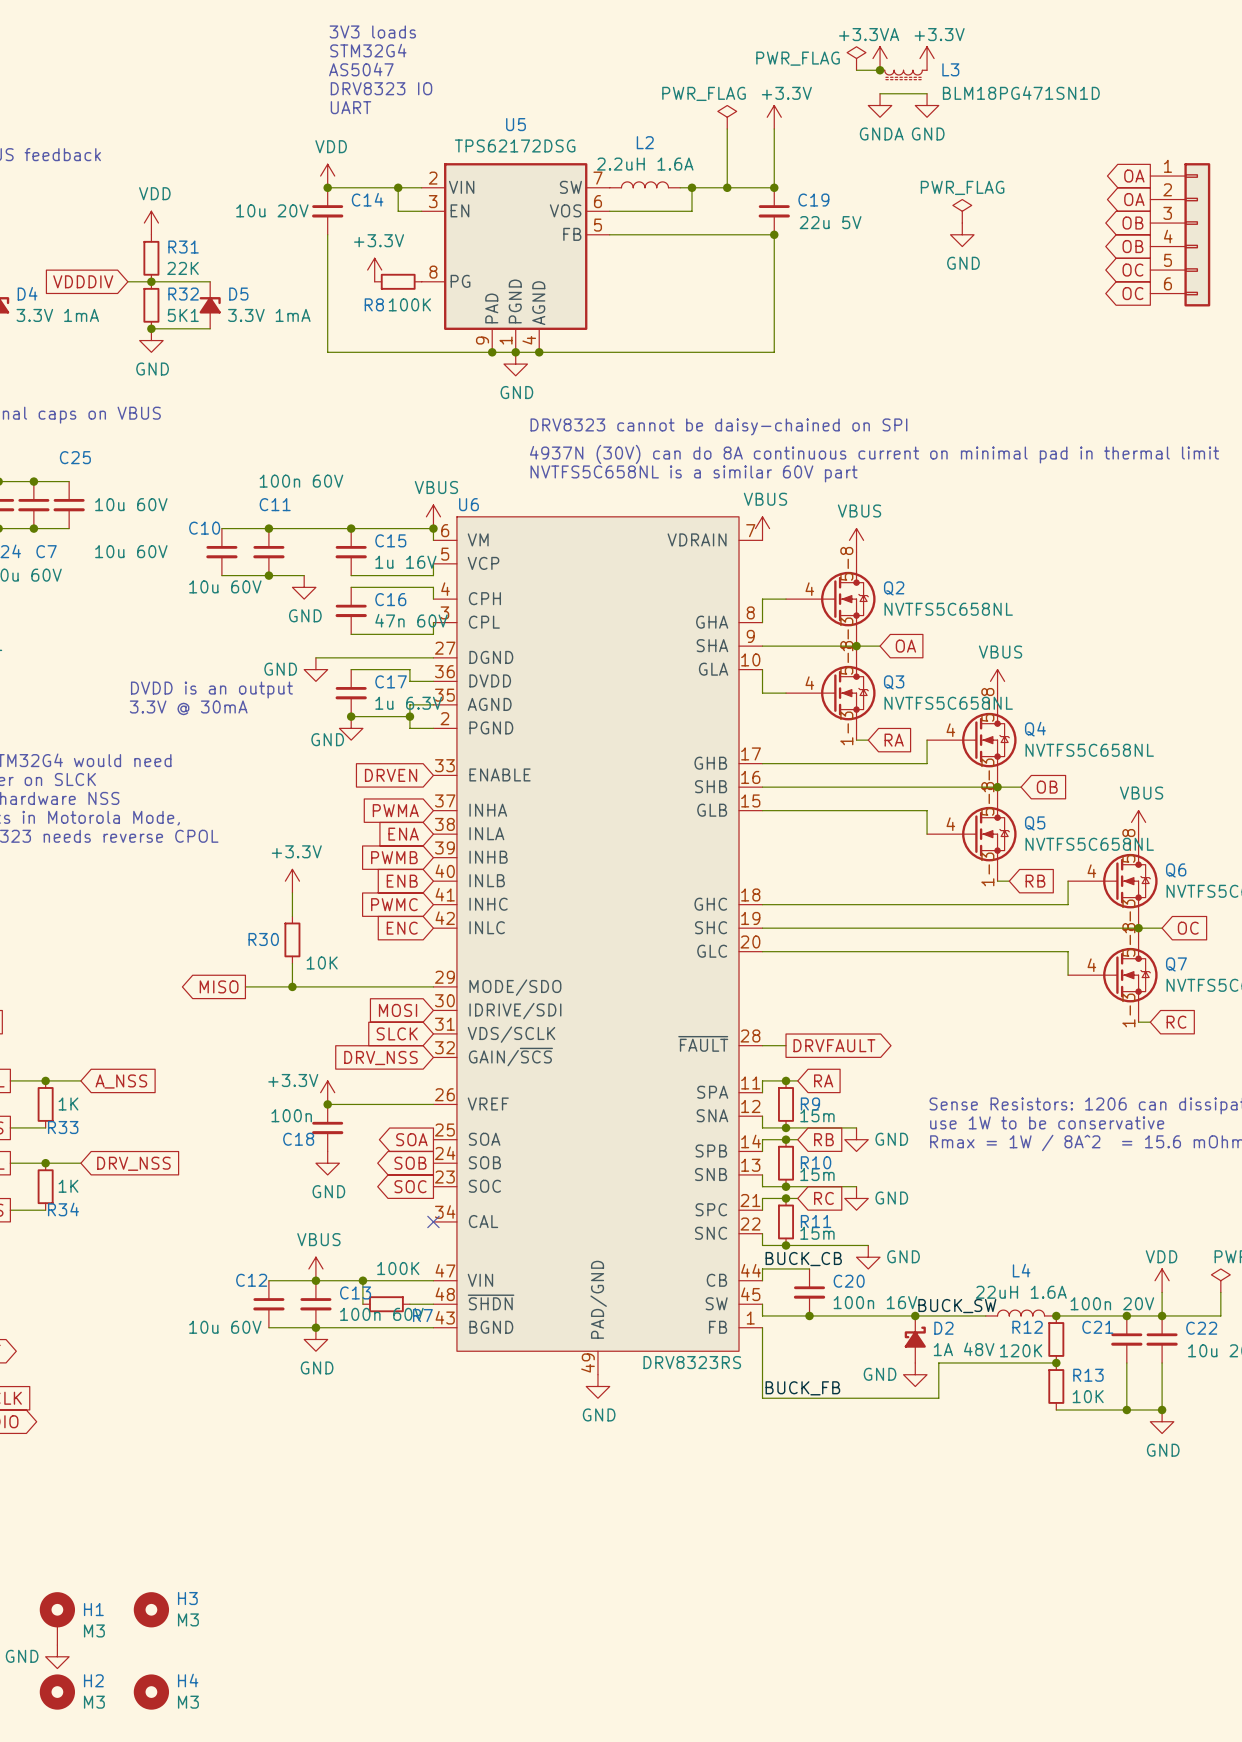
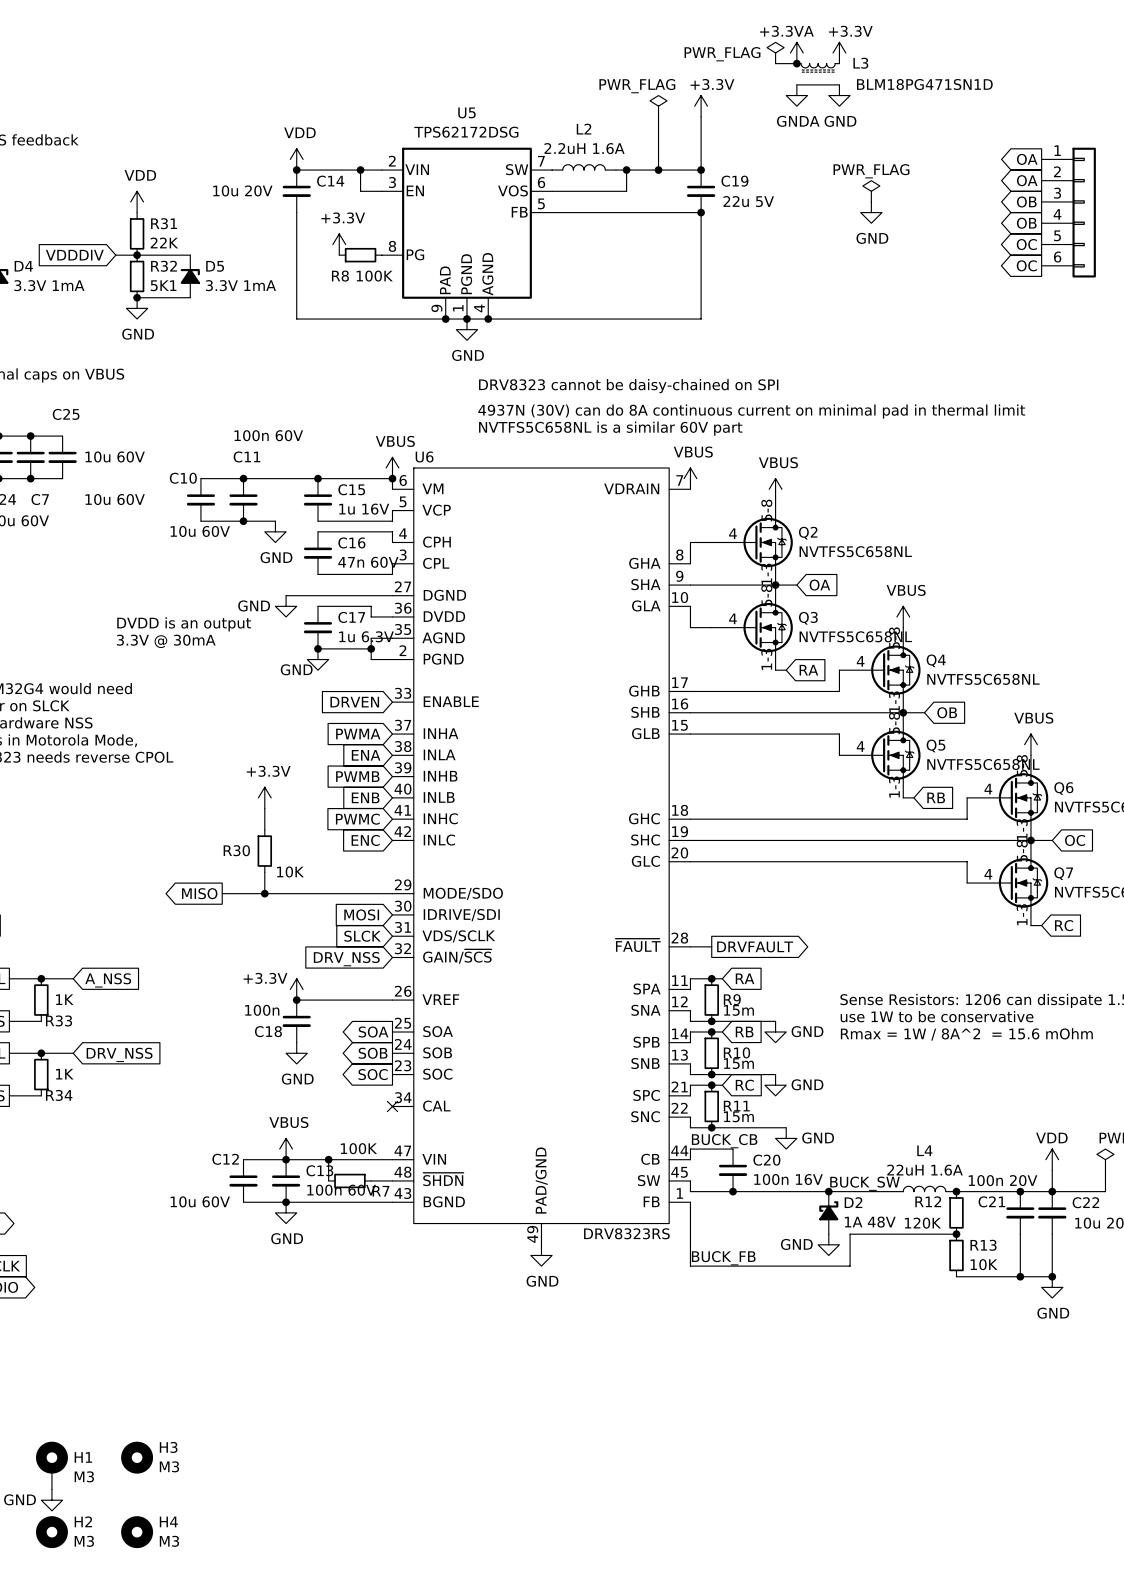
text: 3V3 loads (372, 31) -> none
text: STM32G4 (368, 50) -> none
text: AS5047 (361, 69) -> none
text: DRV8323 IO (381, 88) -> none
text: UART (350, 107) -> none

